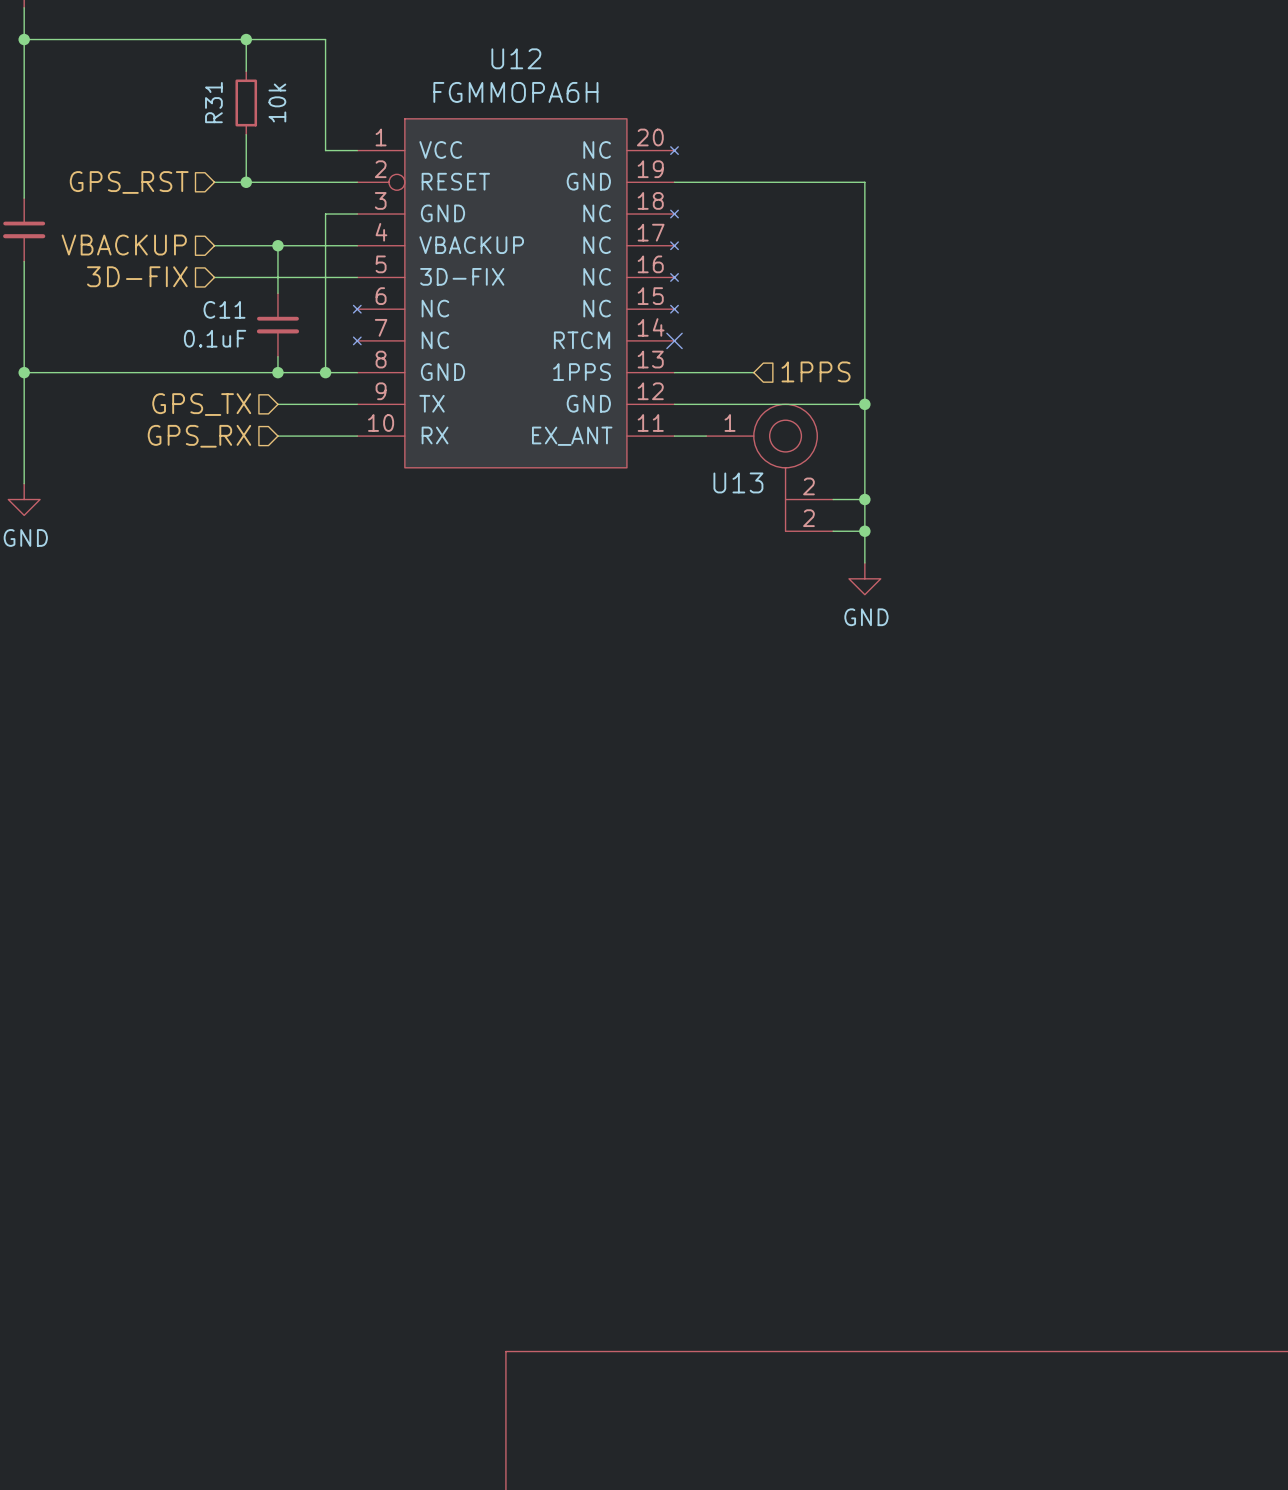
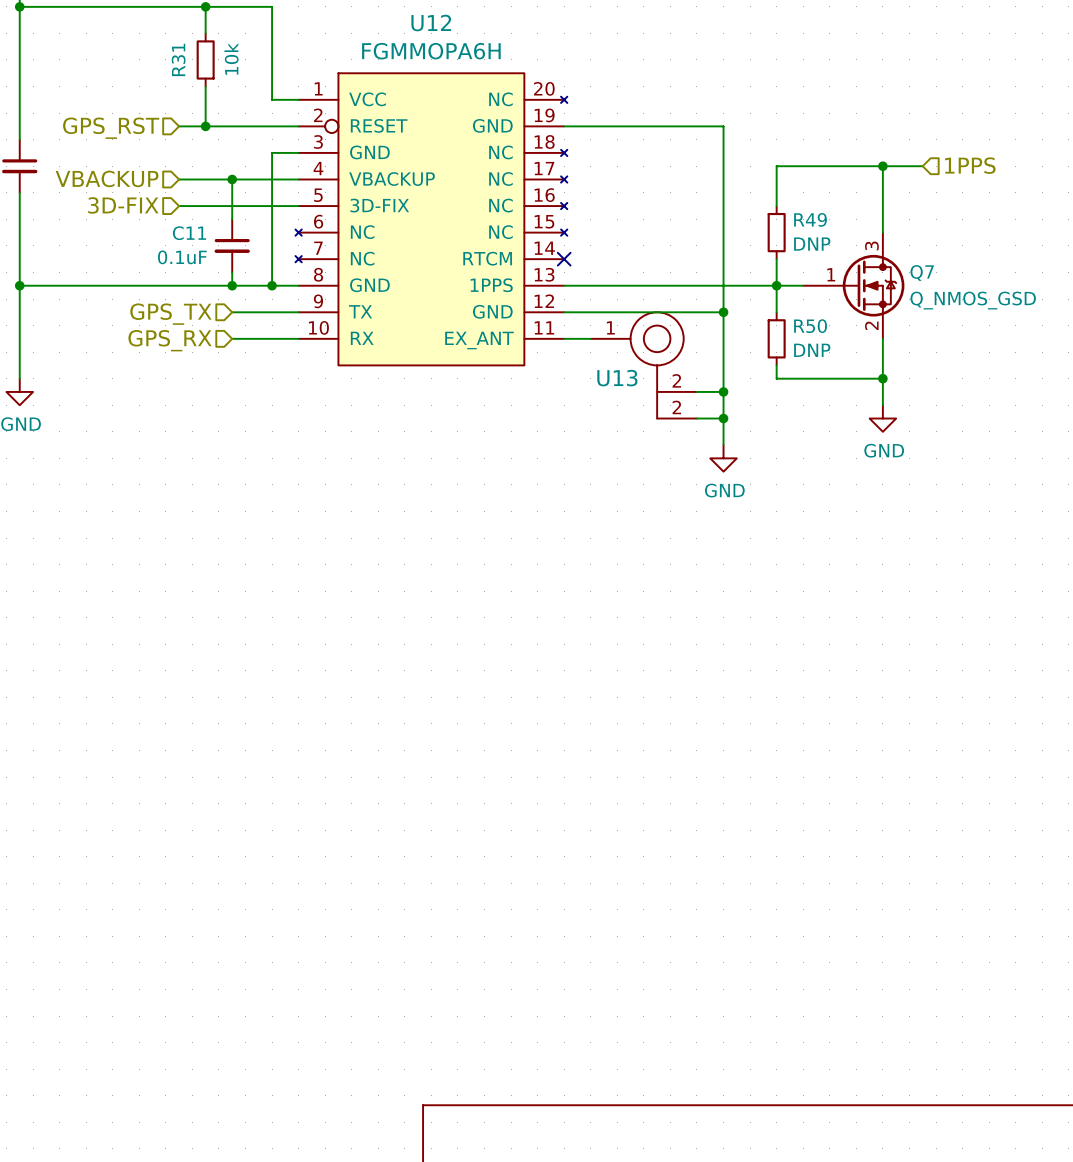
wire: none -> (882, 166) (882, 232)
junction: none -> (882, 166)
wire: none -> (922, 166) (776, 166) (776, 206)
hierarchical label: none -> 1PPS (970, 165)
R49: none -> DNP (776, 232)
wire: none -> (776, 259) (776, 312)
hierarchical label: 1PPS (816, 371) -> none
wire: none -> (630, 285) (803, 285)
junction: none -> (776, 285)
Q7: none -> Q_NMOS_GSD (853, 285)
R50: none -> DNP (776, 338)
wire: none -> (882, 338) (882, 405)
wire: none -> (776, 365) (776, 378) (882, 378)
junction: none -> (882, 378)
power symbol: none -> GND (882, 418)

